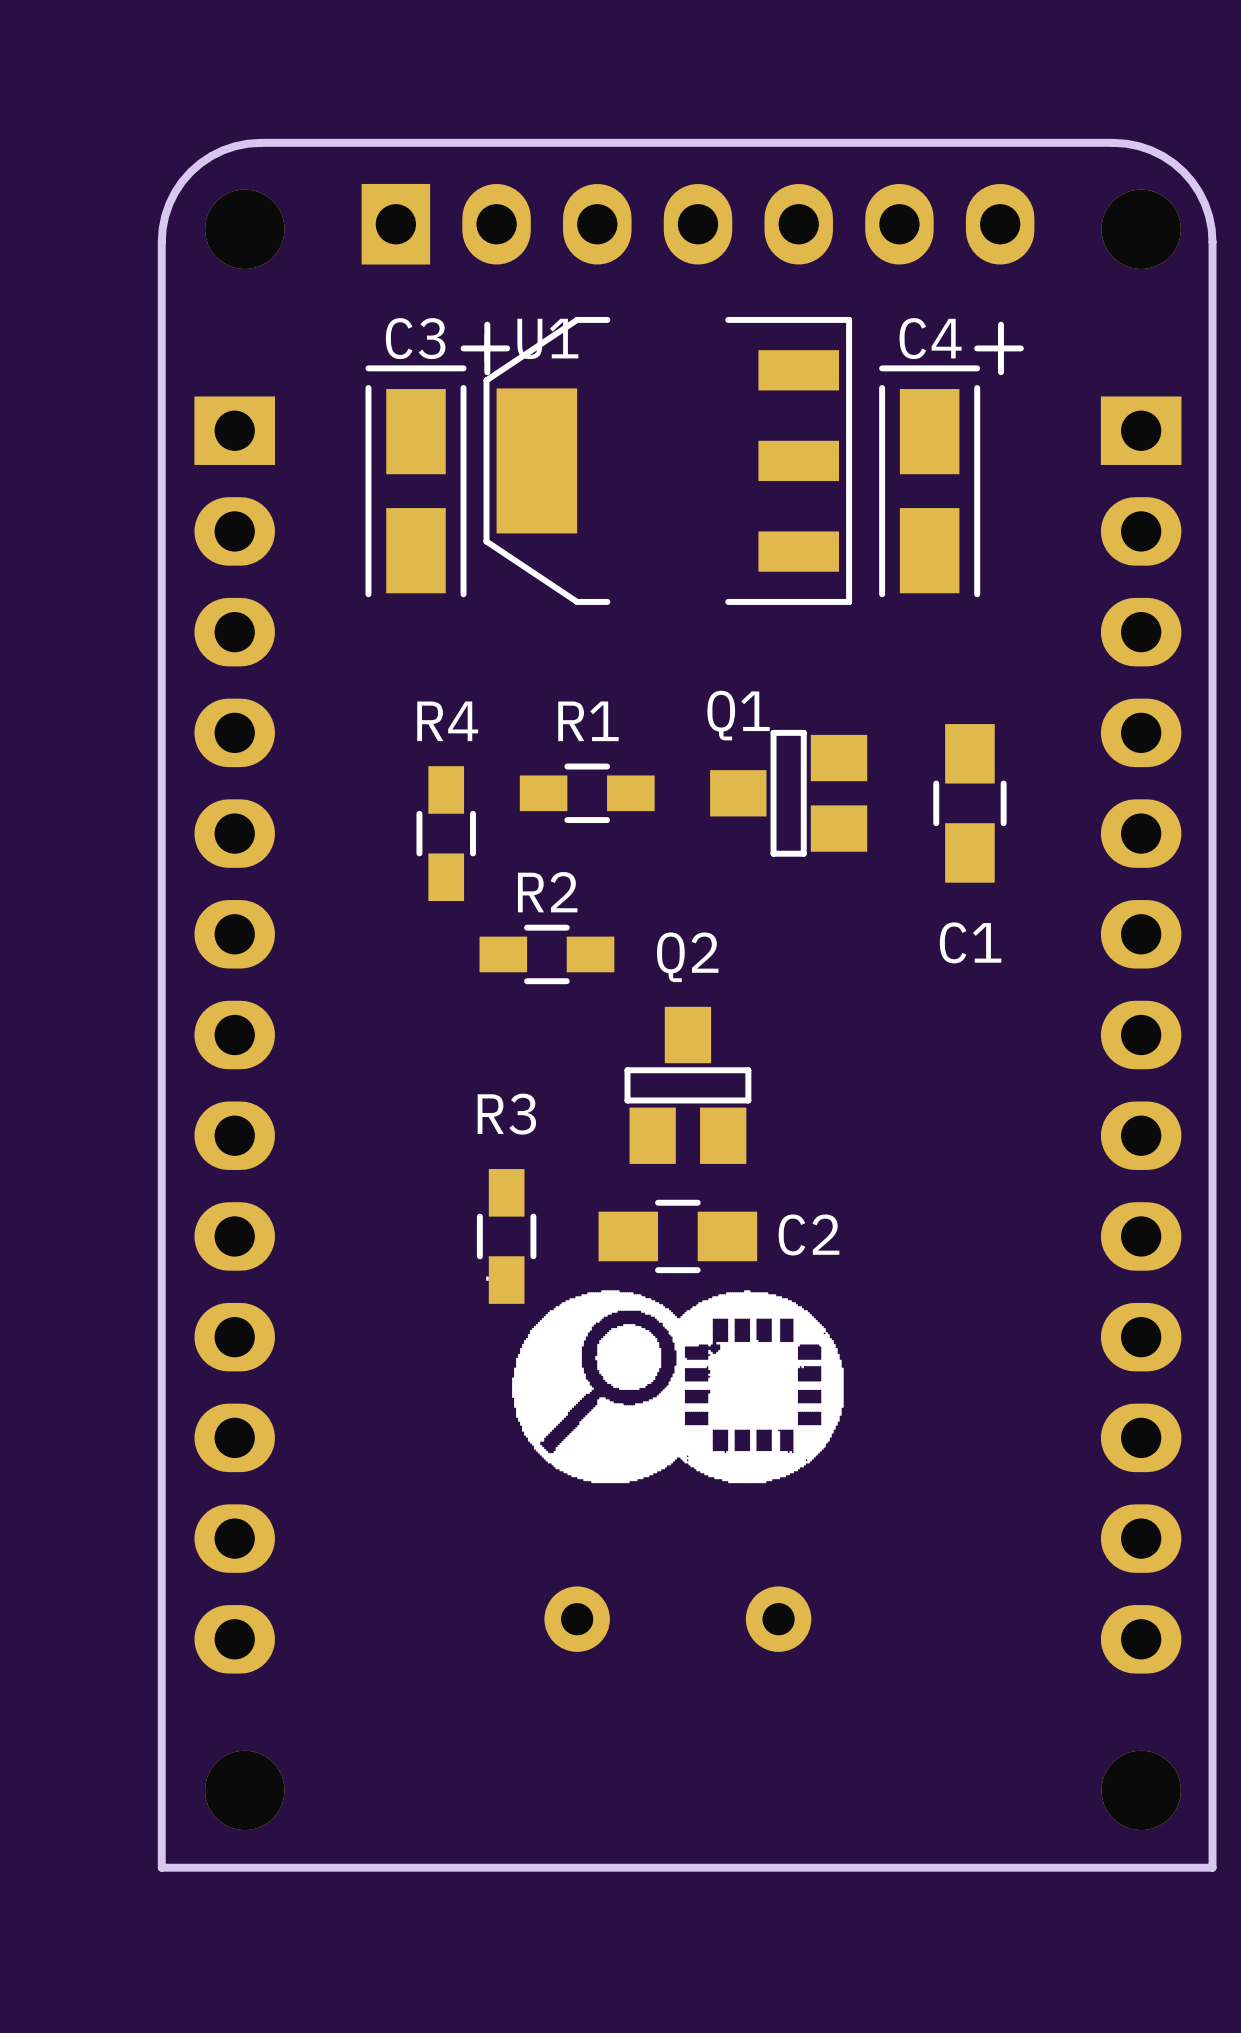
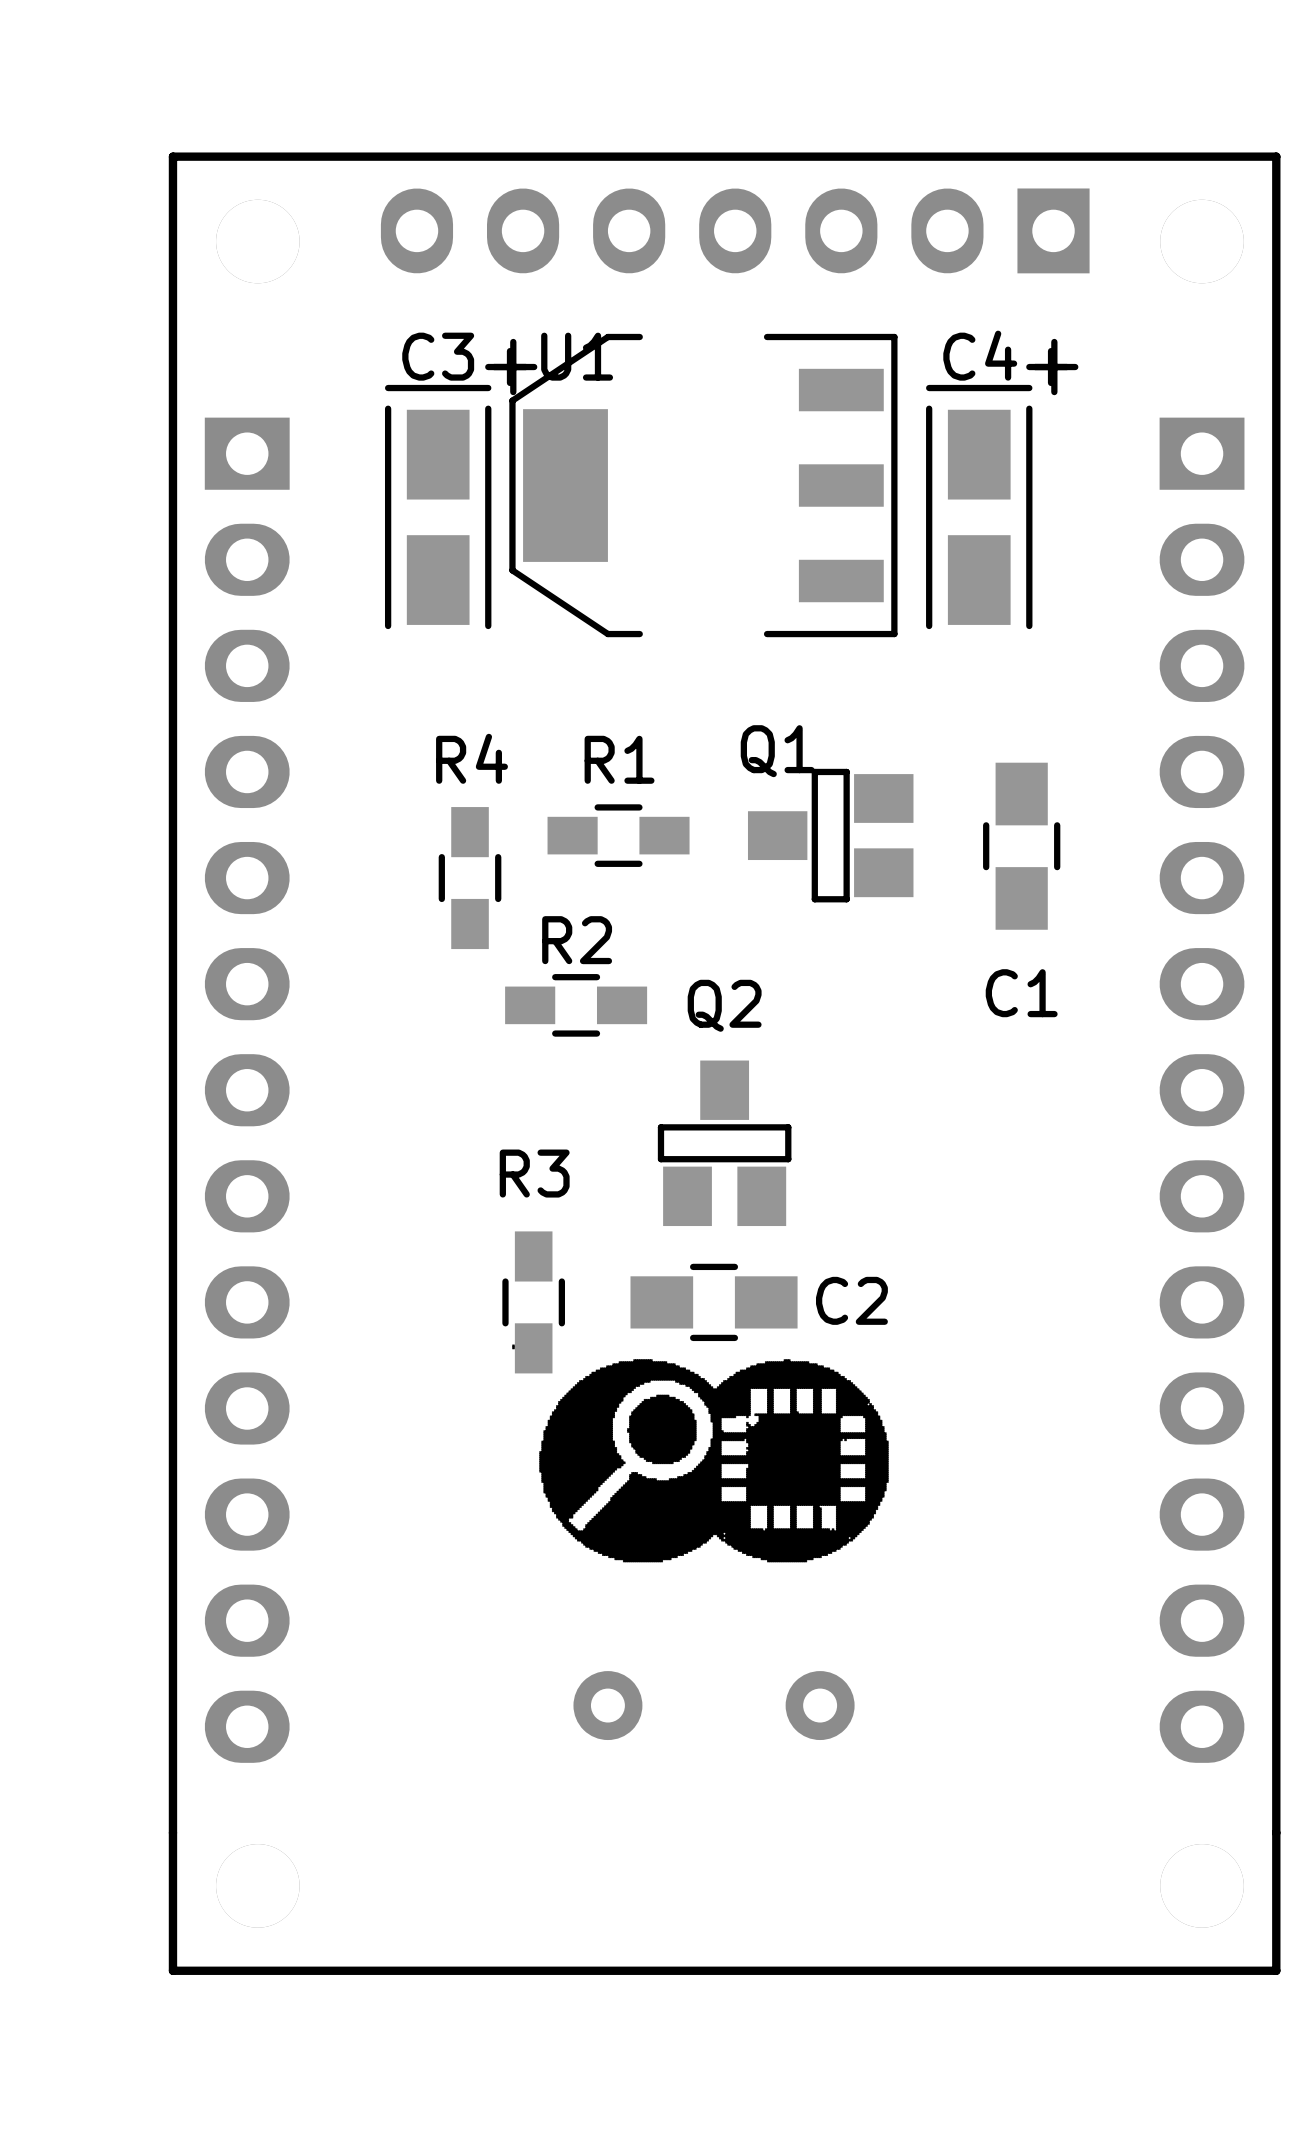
board edge: (1113, 142) (260, 142) (235, 146) (211, 156) (190, 171) (175, 192) (165, 216) (161, 241) (161, 1867) (1212, 1867) (1212, 241) (1211, 229) (1204, 204) (1192, 181) (1183, 171) (1173, 163) (1151, 150) (1126, 143) (1113, 142) -> (1276, 156) (1276, 1970) (172, 1970) (172, 156) (1276, 156)
part rotation: 0° (698, 224) -> 180° (735, 230)

